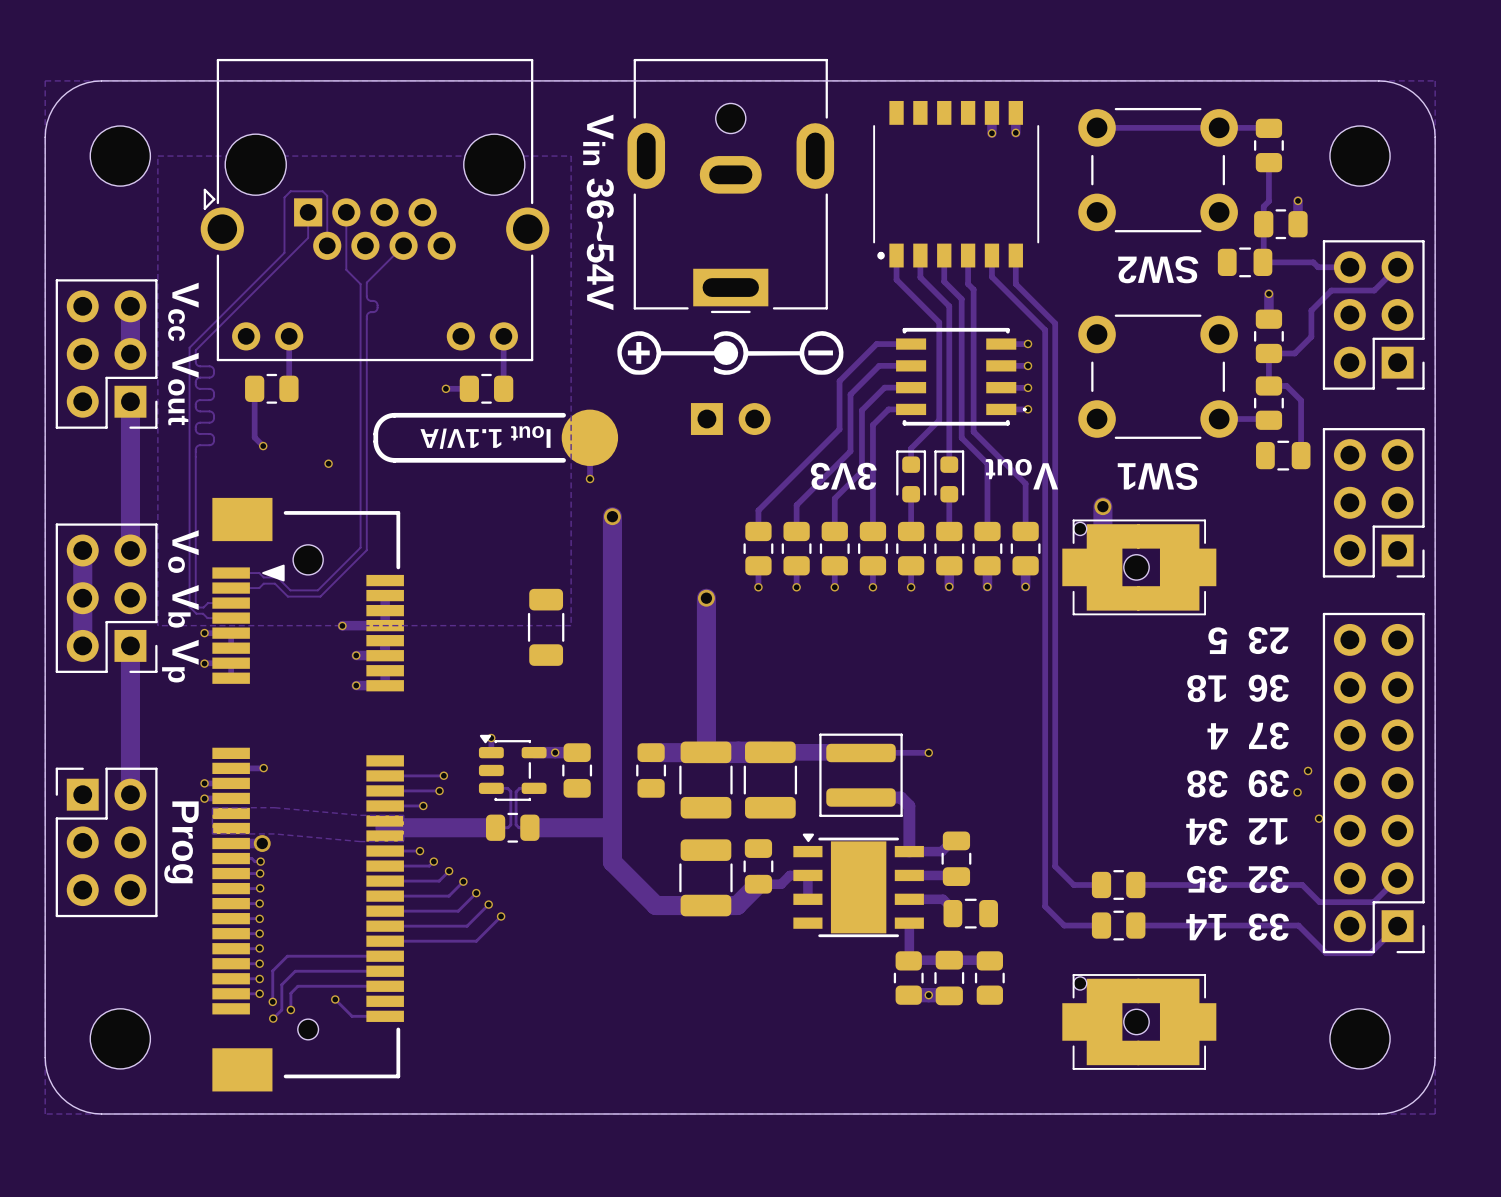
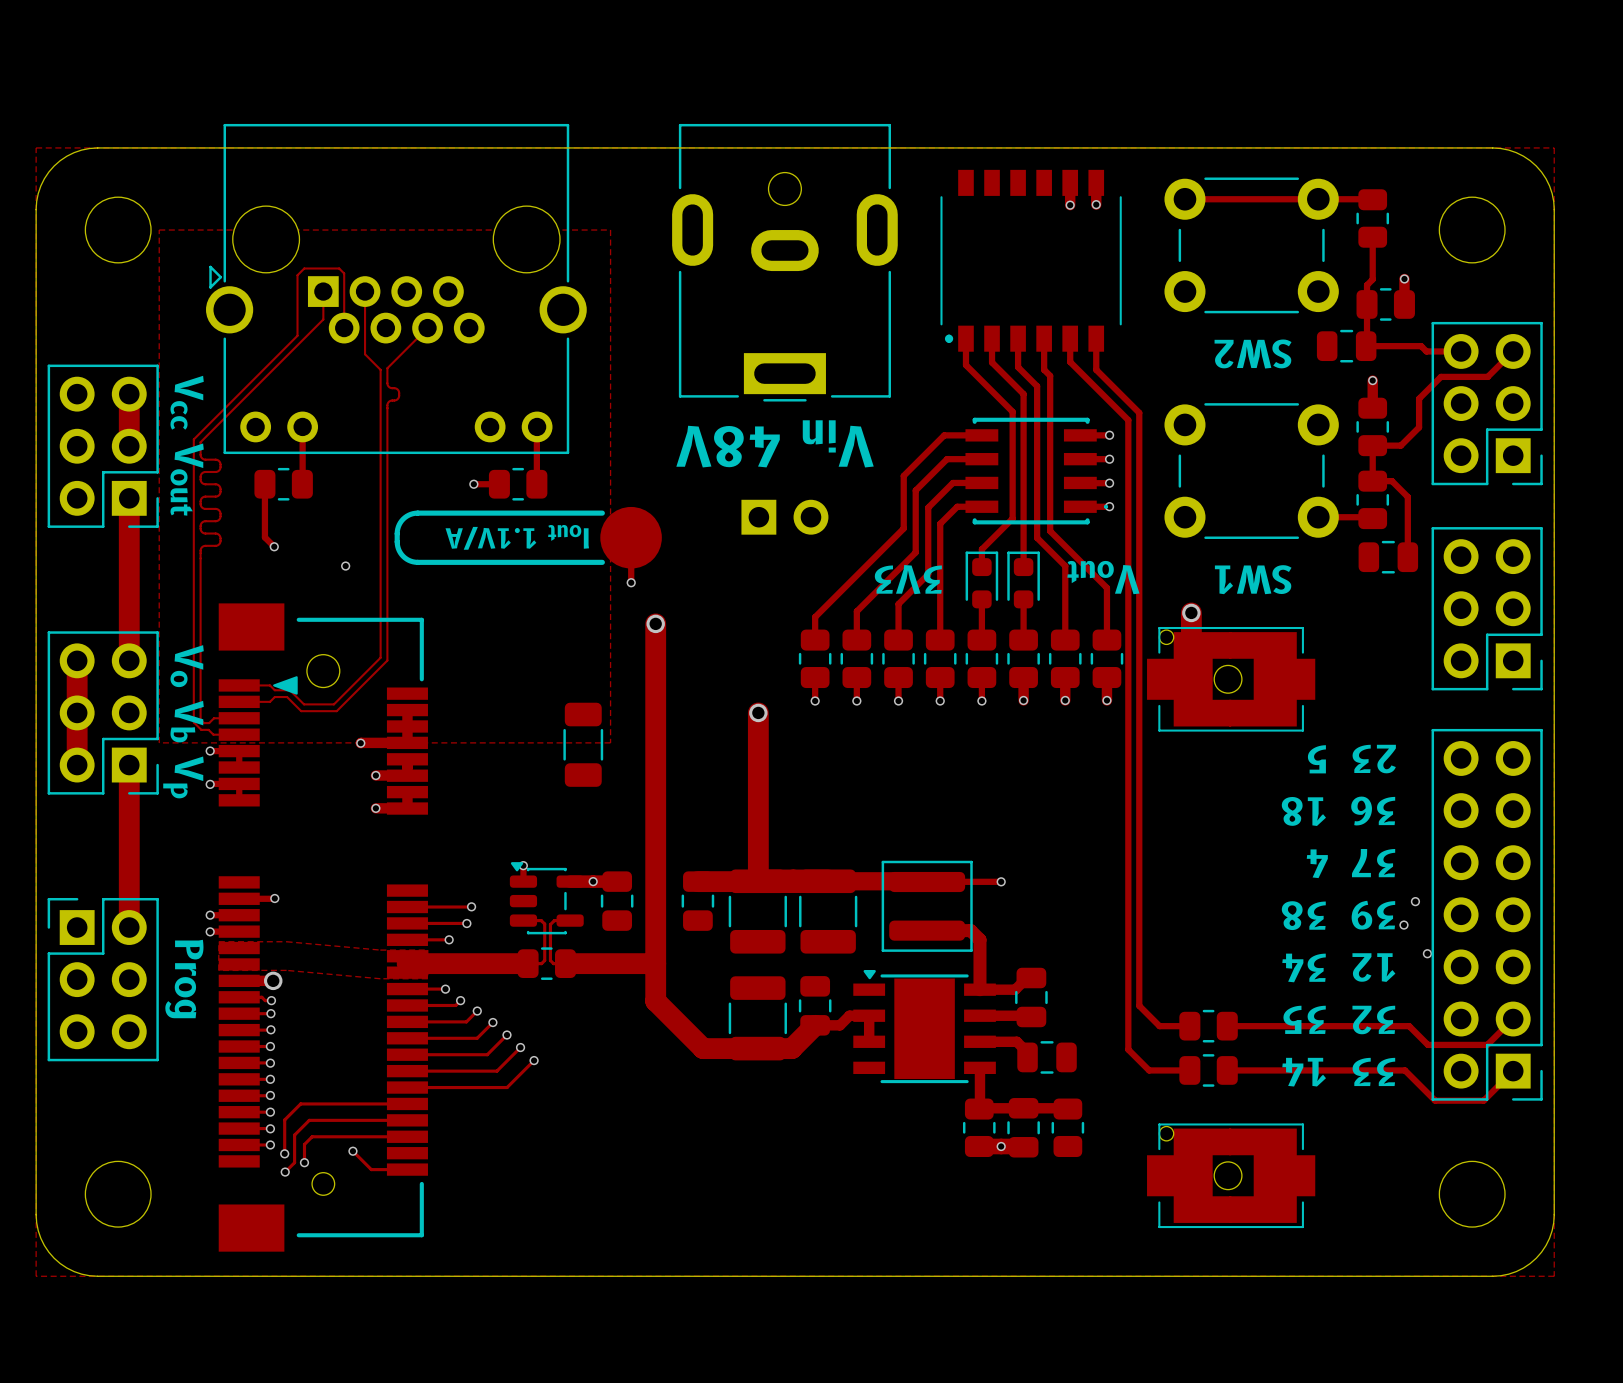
text: Vin 36~54V (598, 212) -> Vin 48V (775, 443)
drawing: [617, 331, 844, 375] -> none

